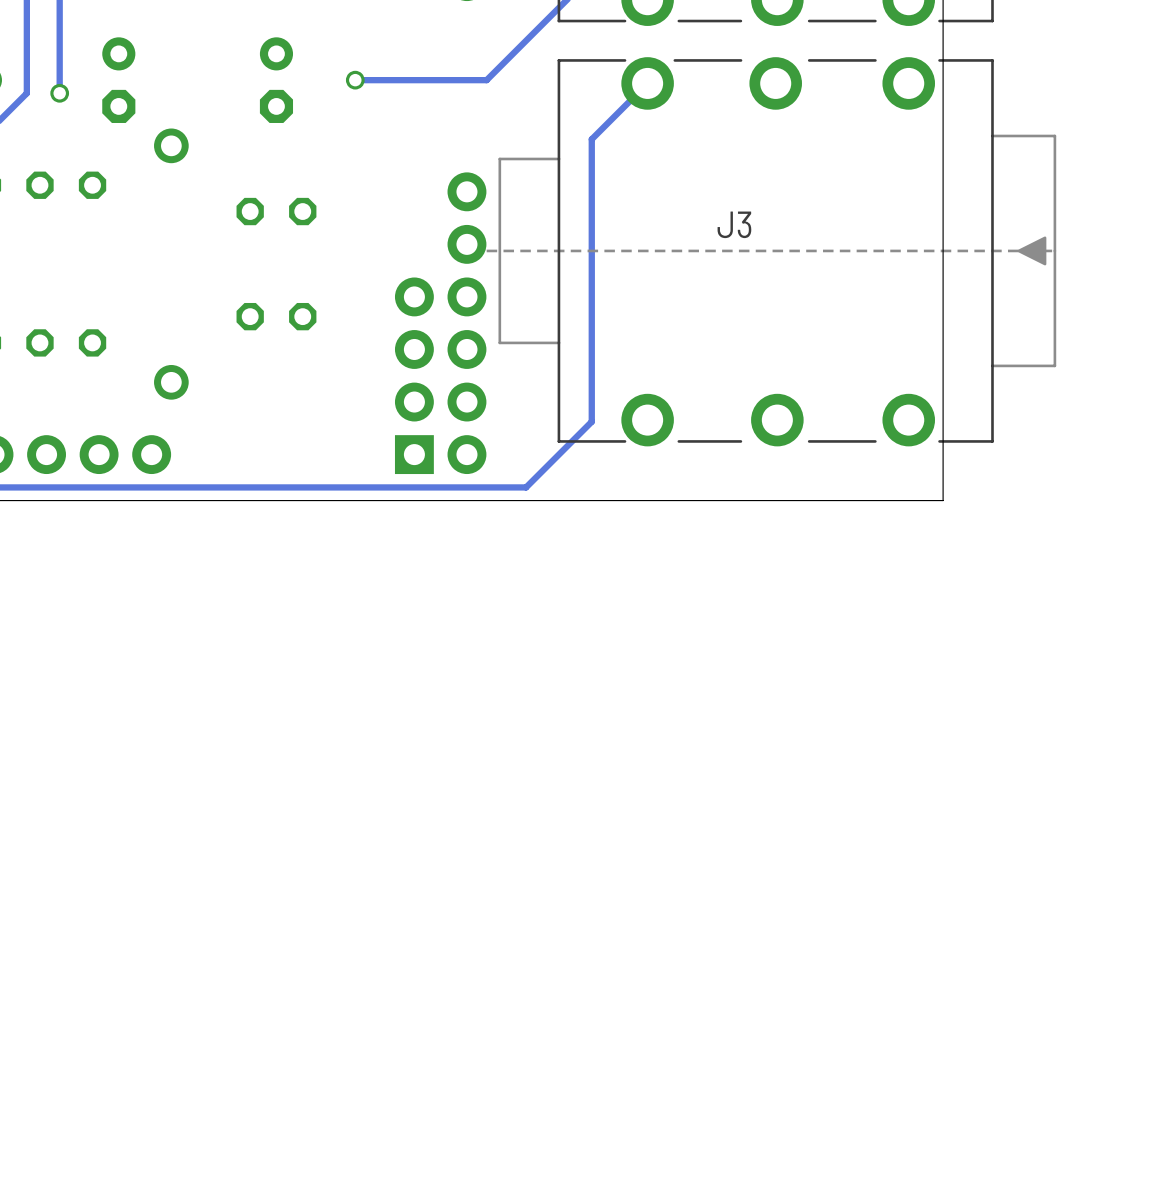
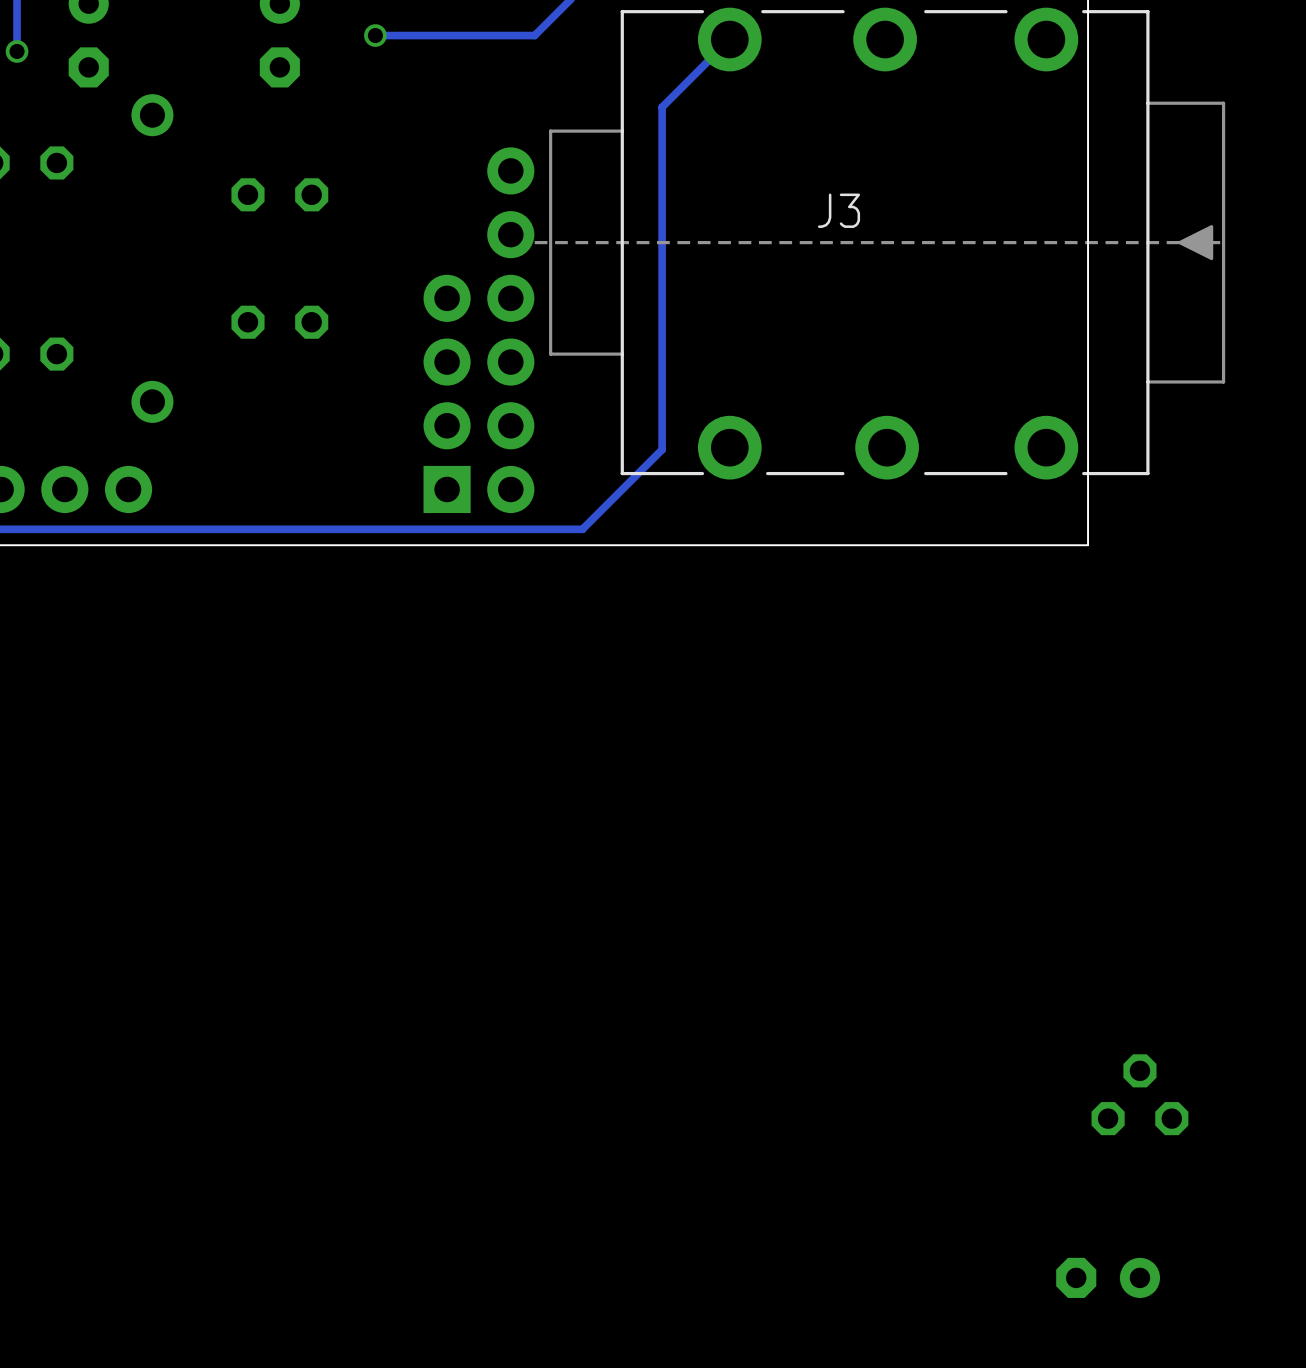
part: none -> (1139, 1094)
part: none -> (1108, 1277)

